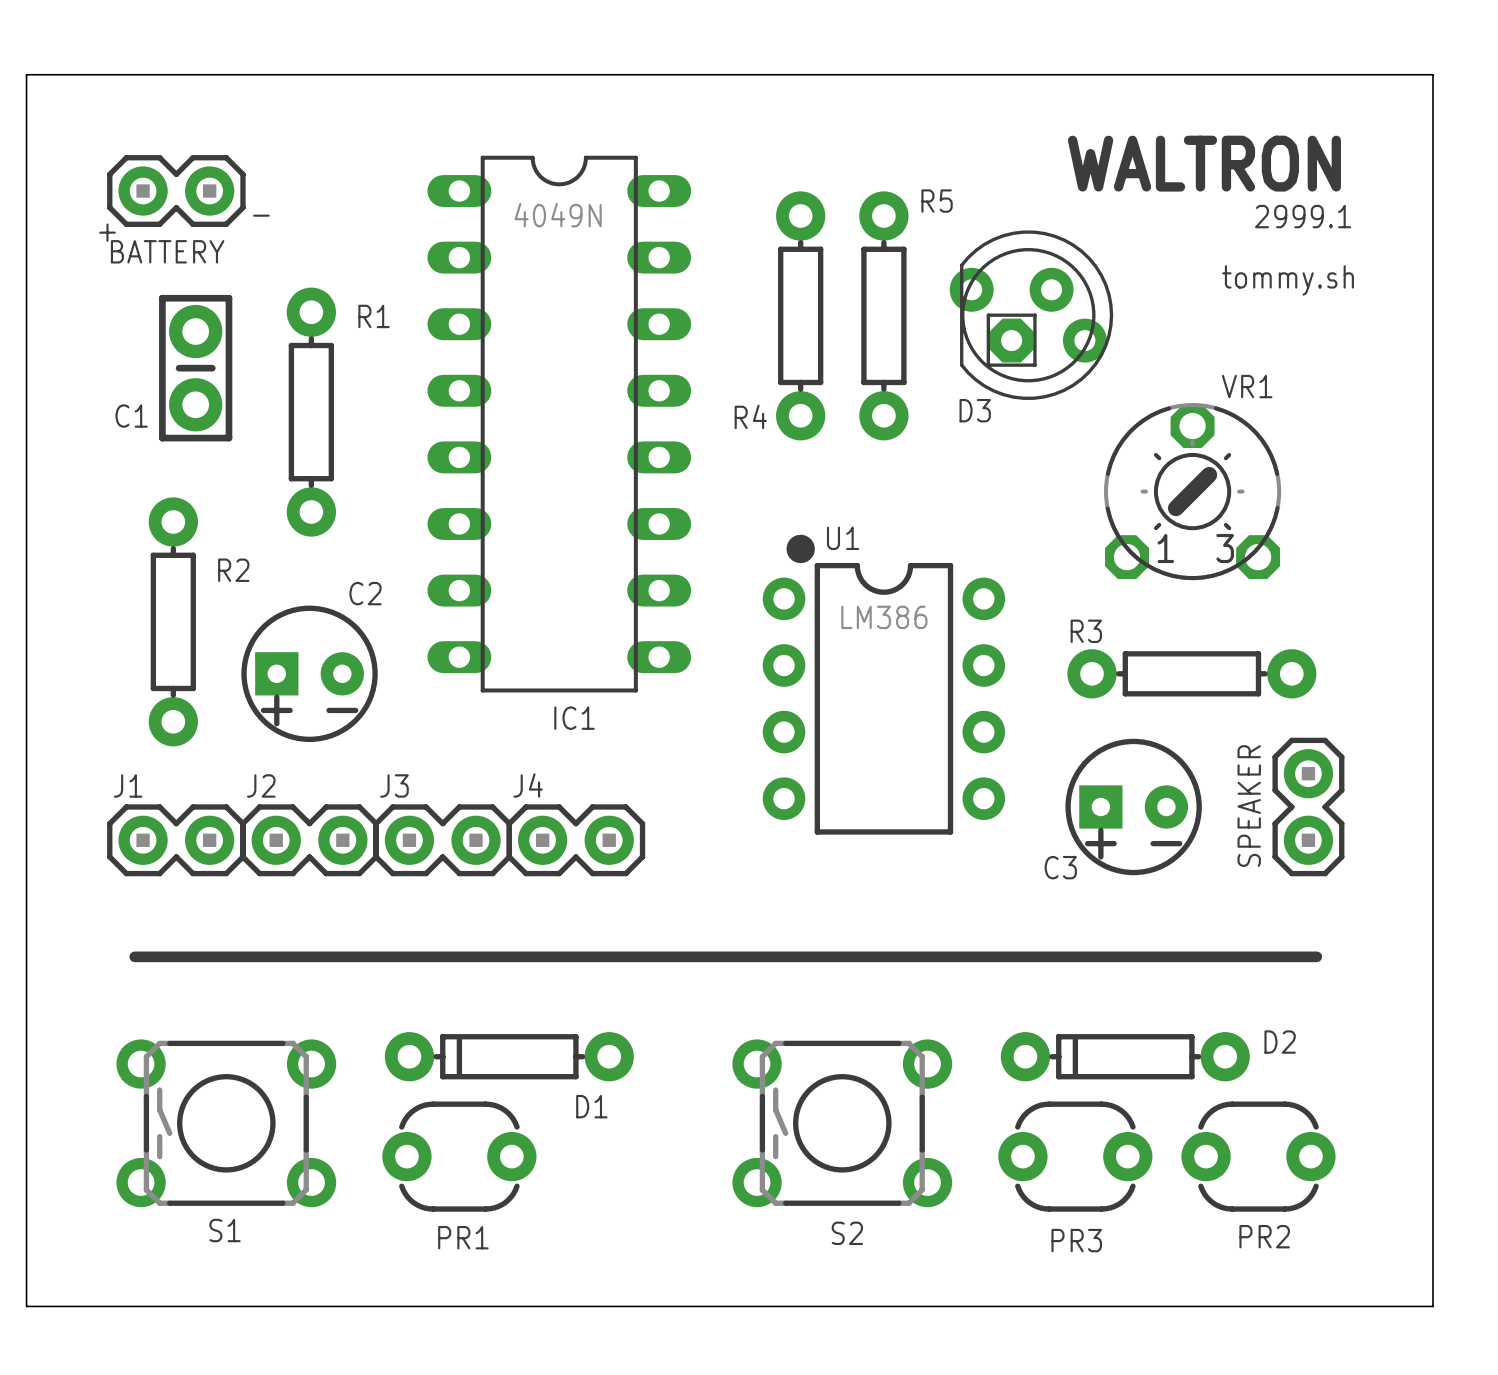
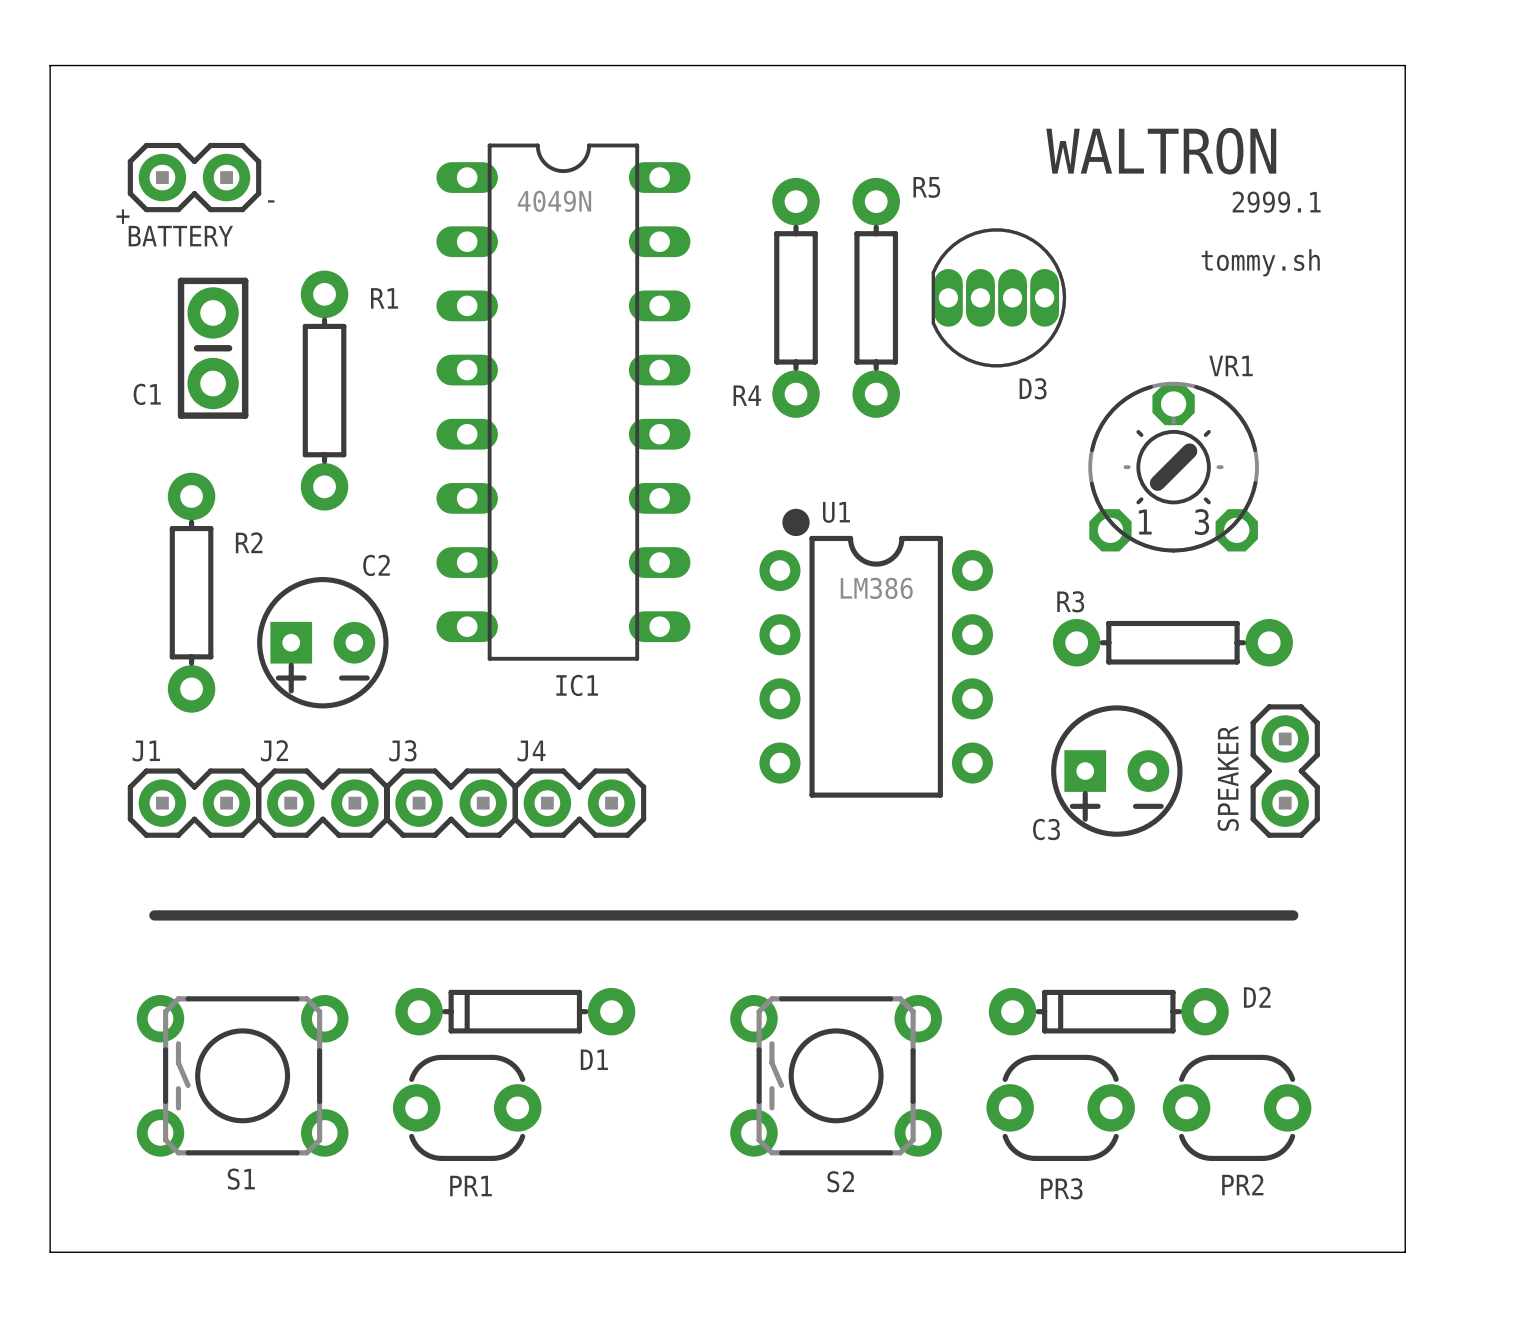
D3 footprint: [949, 230, 1114, 400] -> [931, 228, 1067, 368]
D3 name position: D3 (975, 410) -> D3 (1033, 388)

